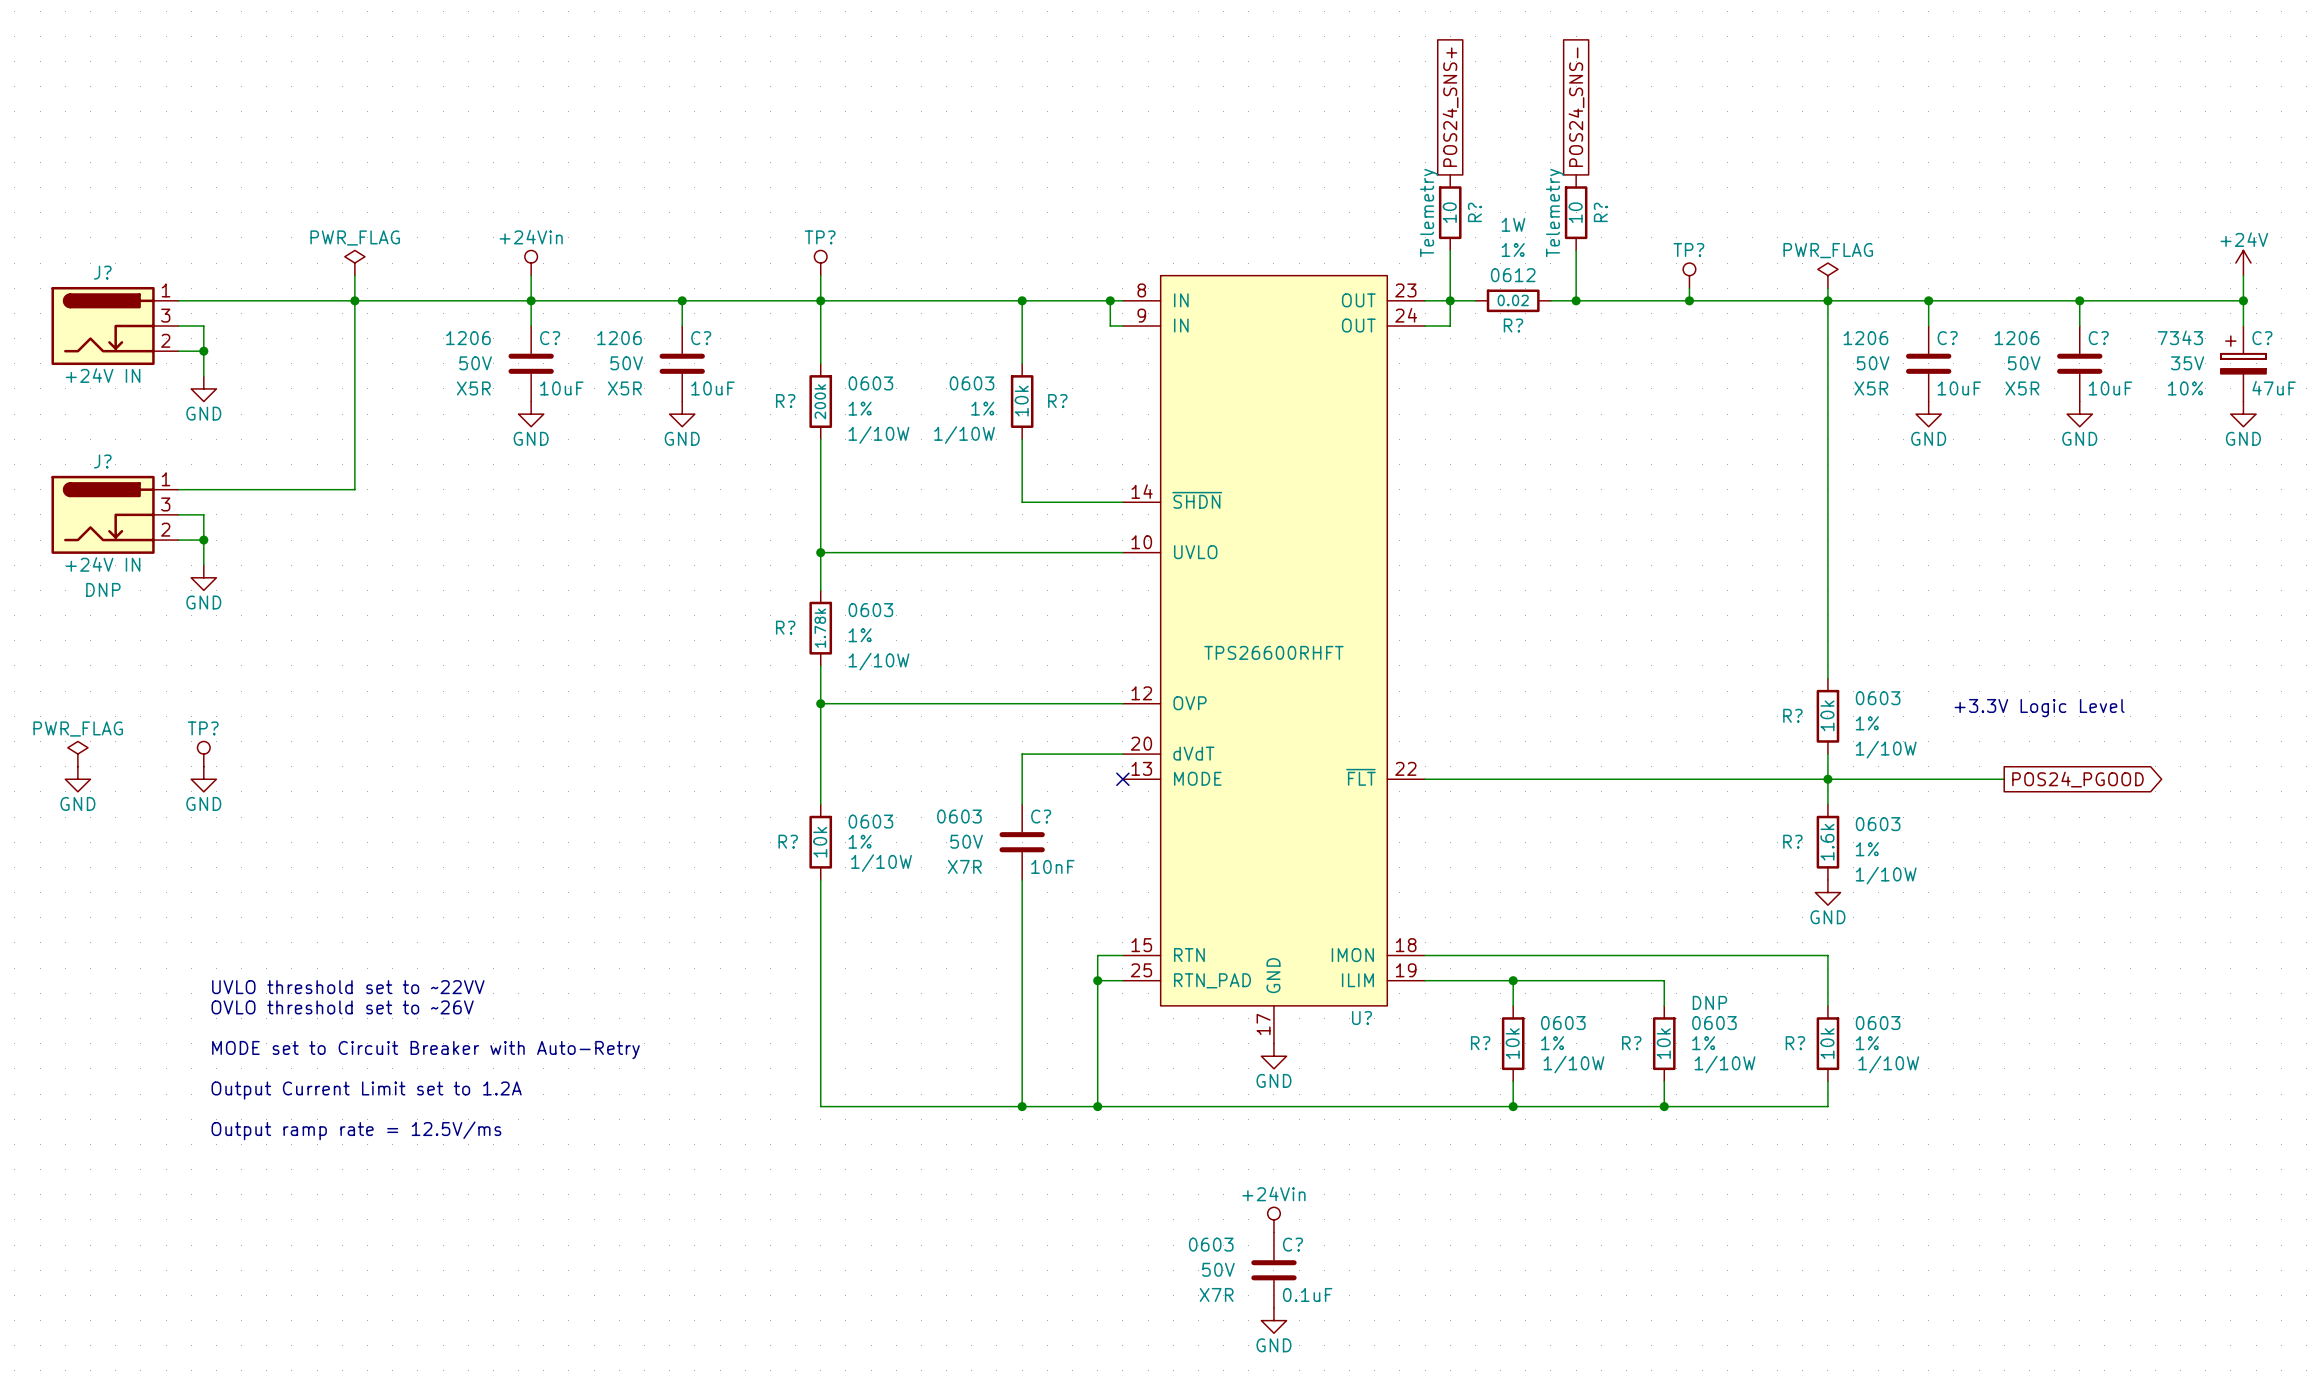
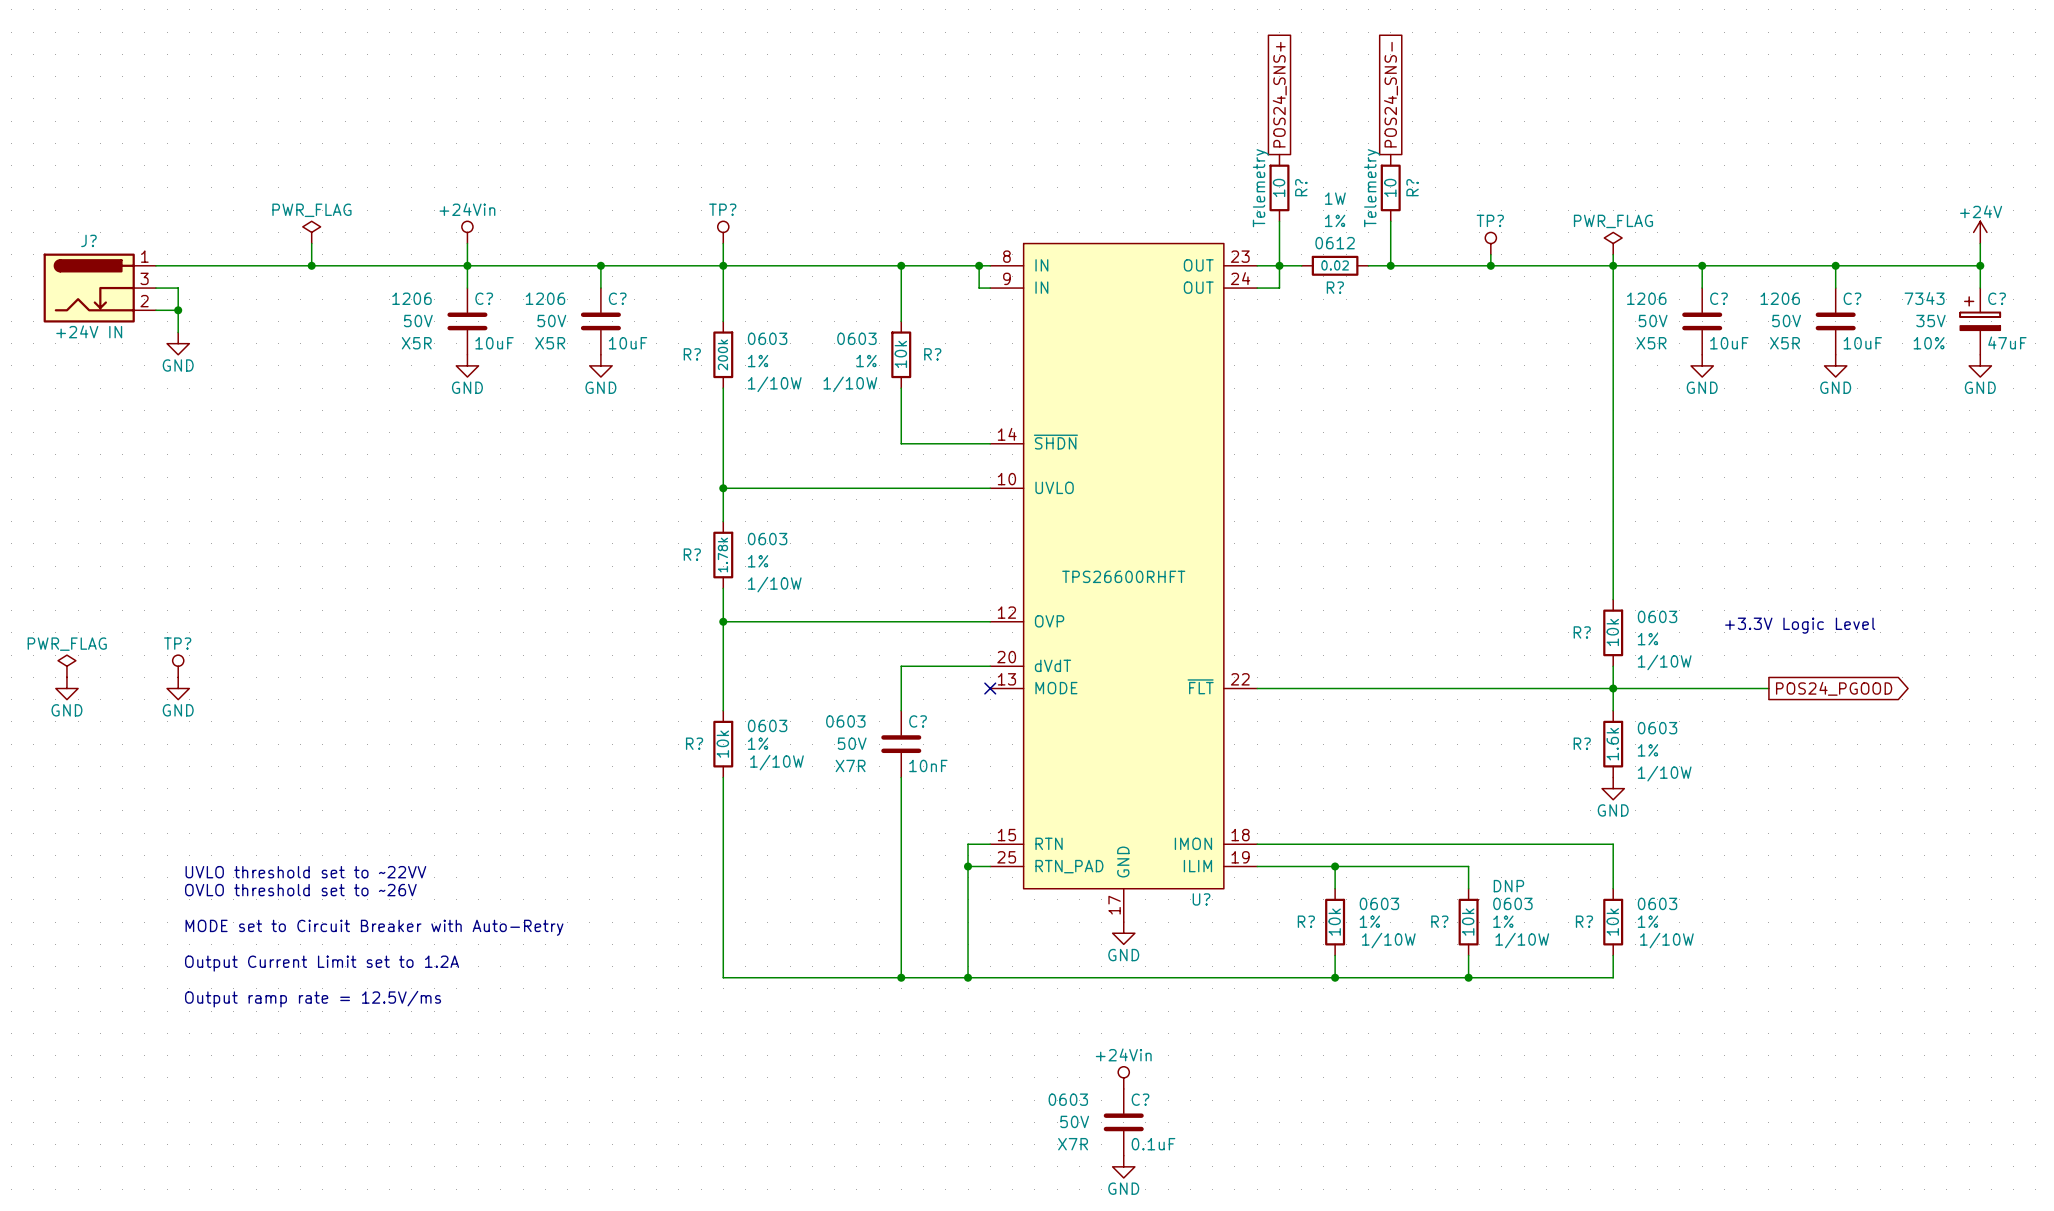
wire: (354, 300) (354, 489) (178, 489) -> none
J?: +24V IN (115, 514) -> none
wire: (178, 514) (203, 514) (203, 565) -> none
wire: (178, 540) (203, 540) -> none
junction: (203, 540) -> none
power symbol: GND (203, 577) -> none

